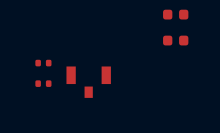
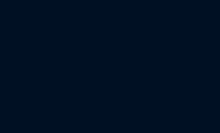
part: (175, 14) -> none
part: (175, 40) -> none
part: (43, 63) -> none
part: (88, 82) -> none
part: (43, 83) -> none

